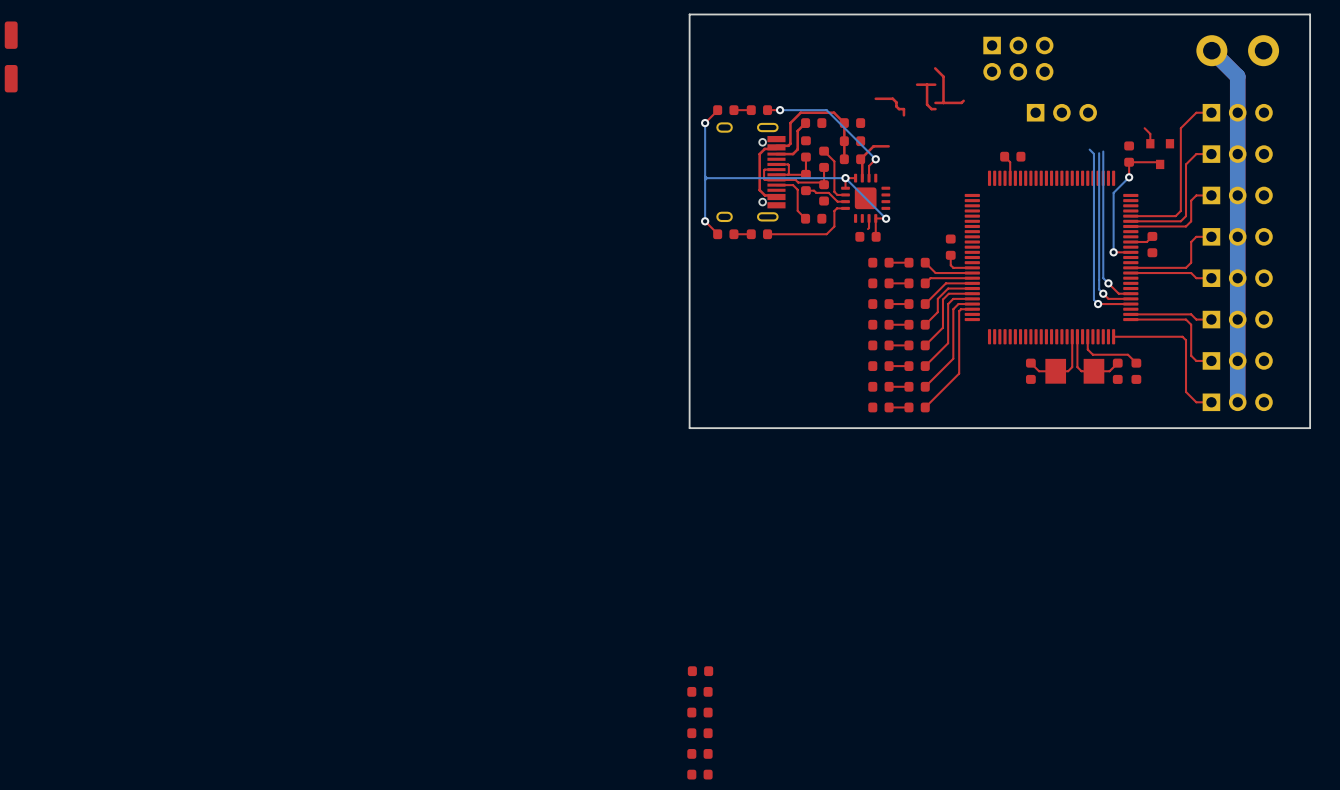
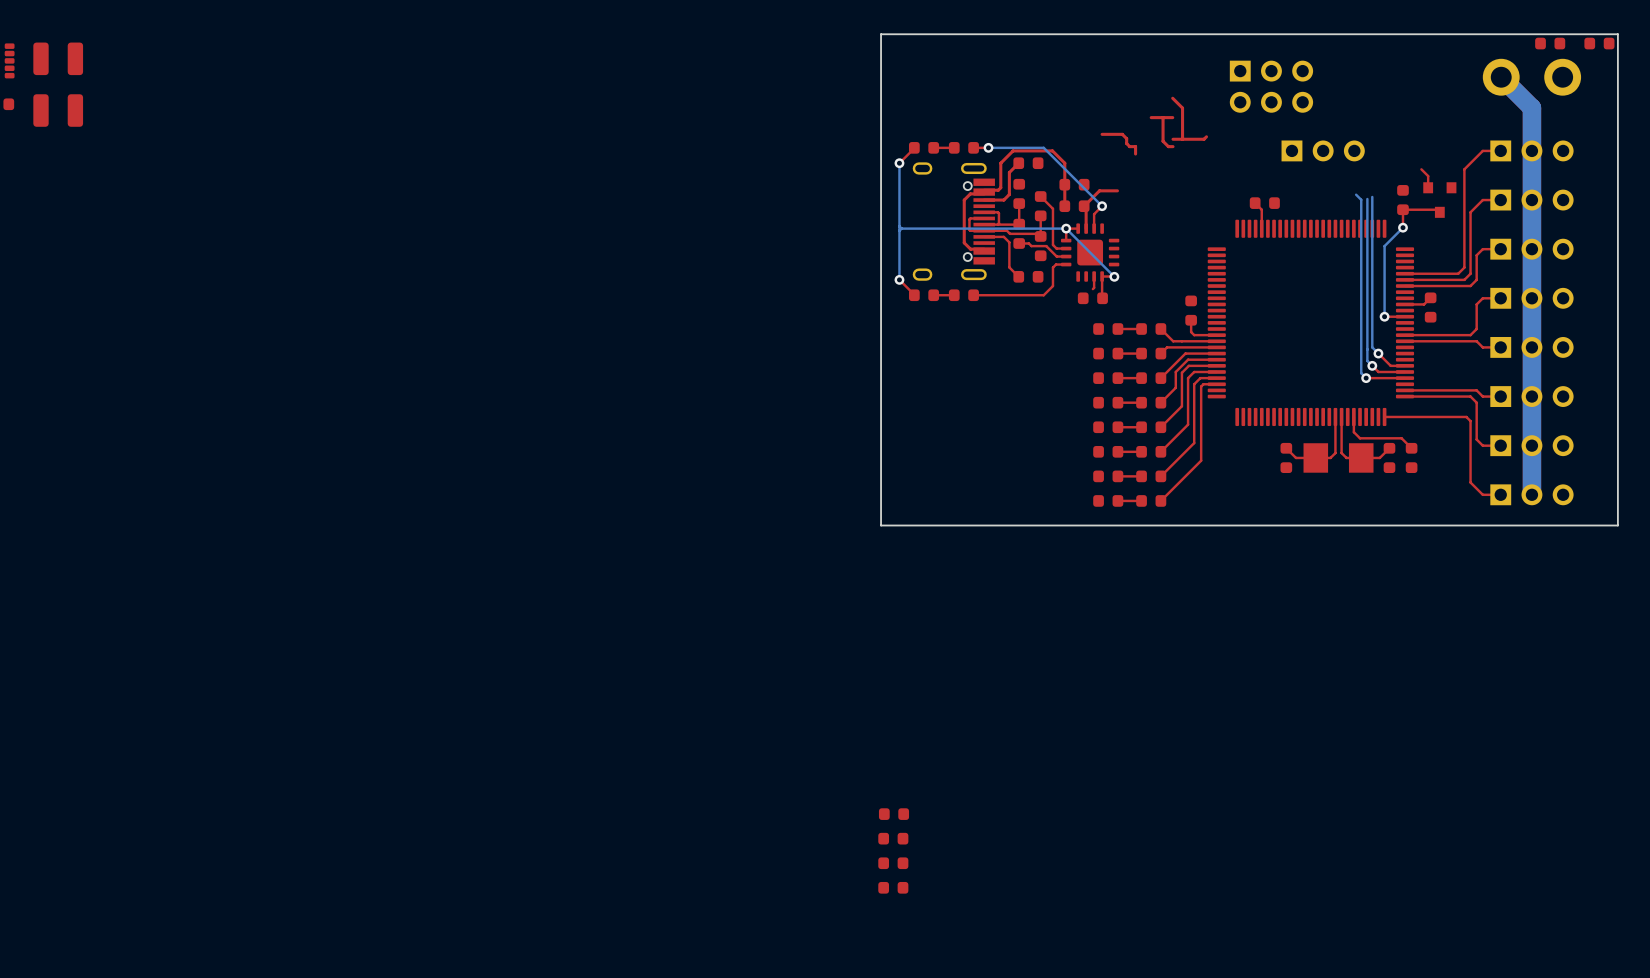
part: none -> (1550, 43)
part: none -> (1599, 43)
part: (852, 123) -> none
part: (699, 753) -> none
part: (699, 774) -> none

